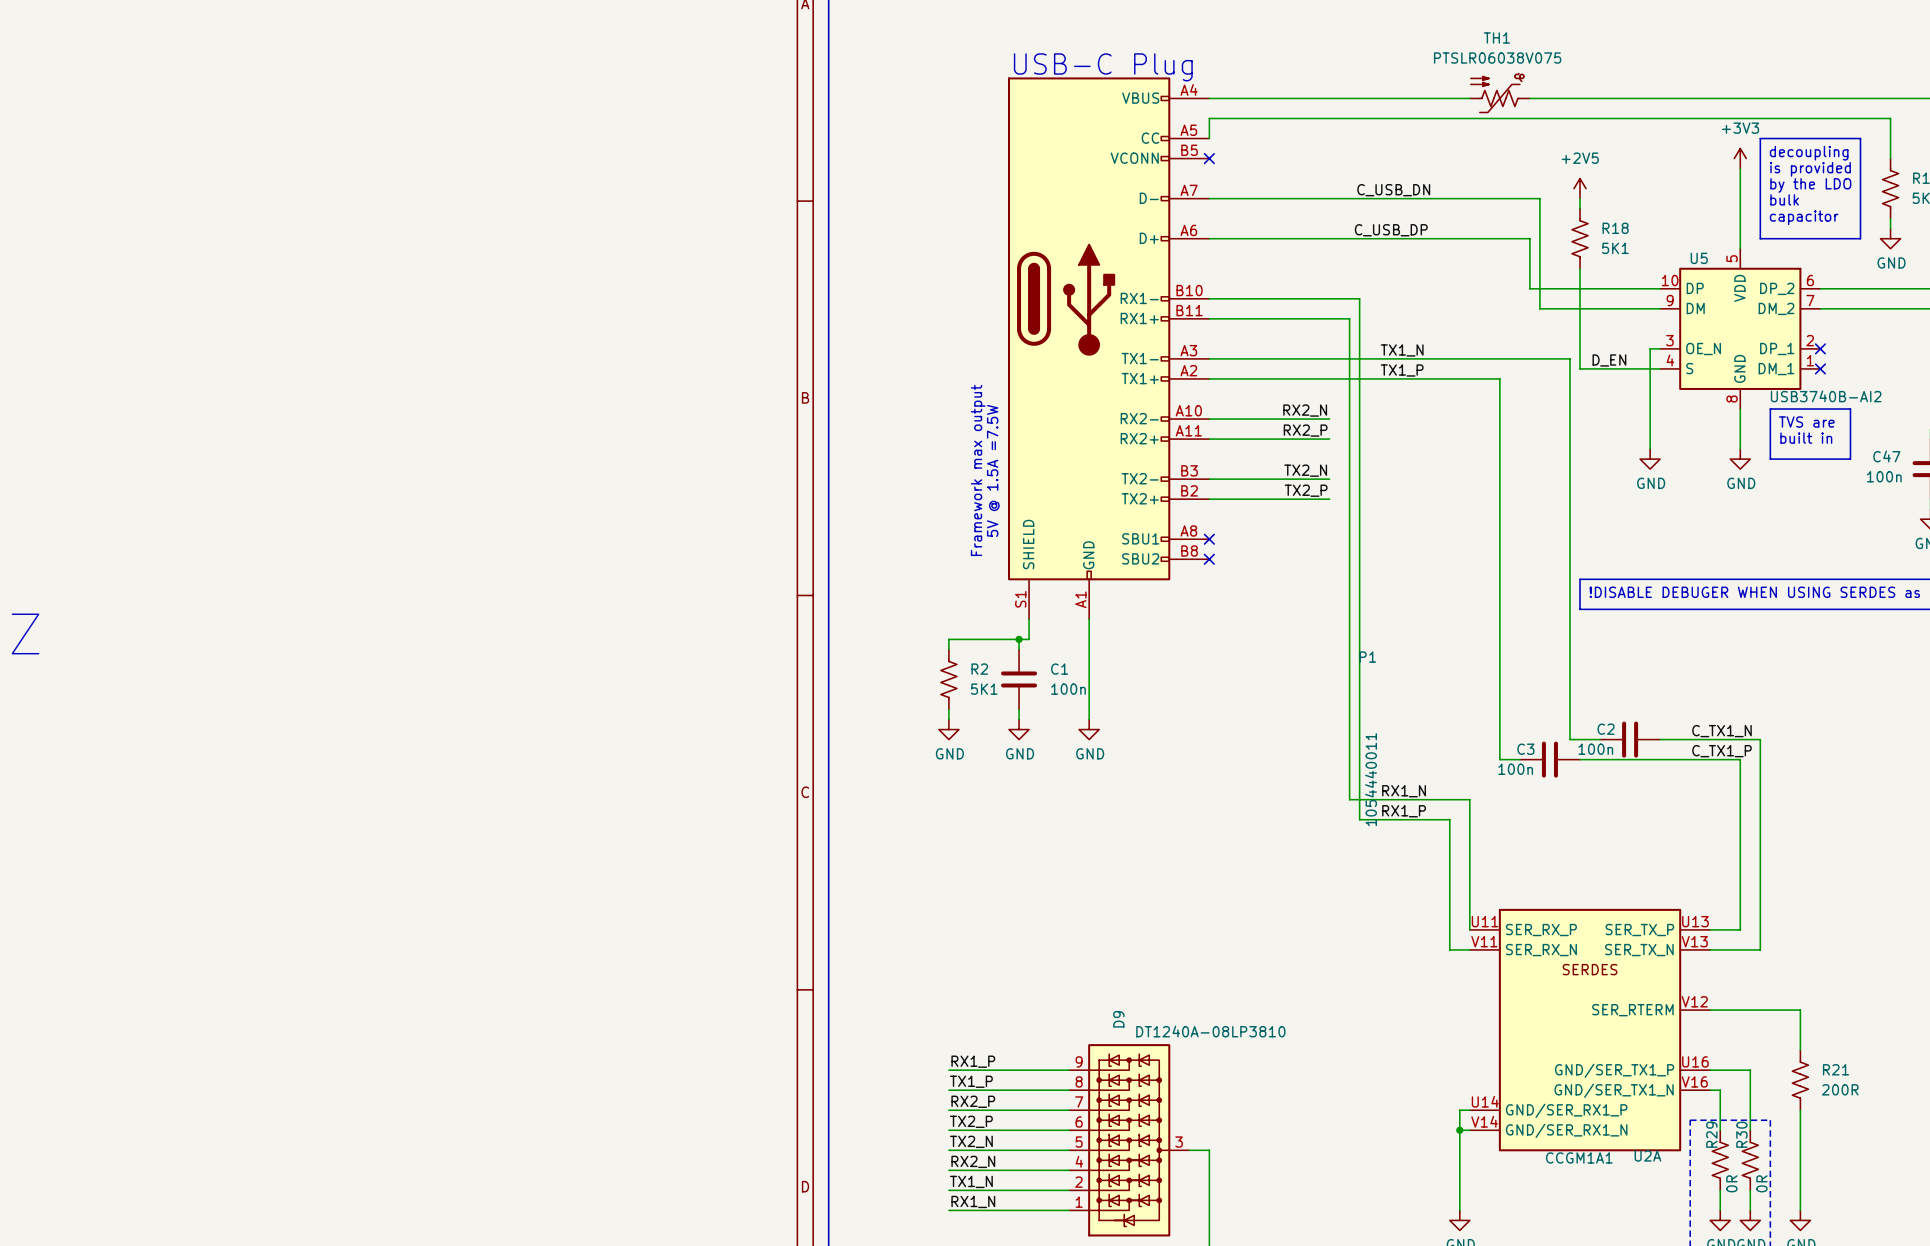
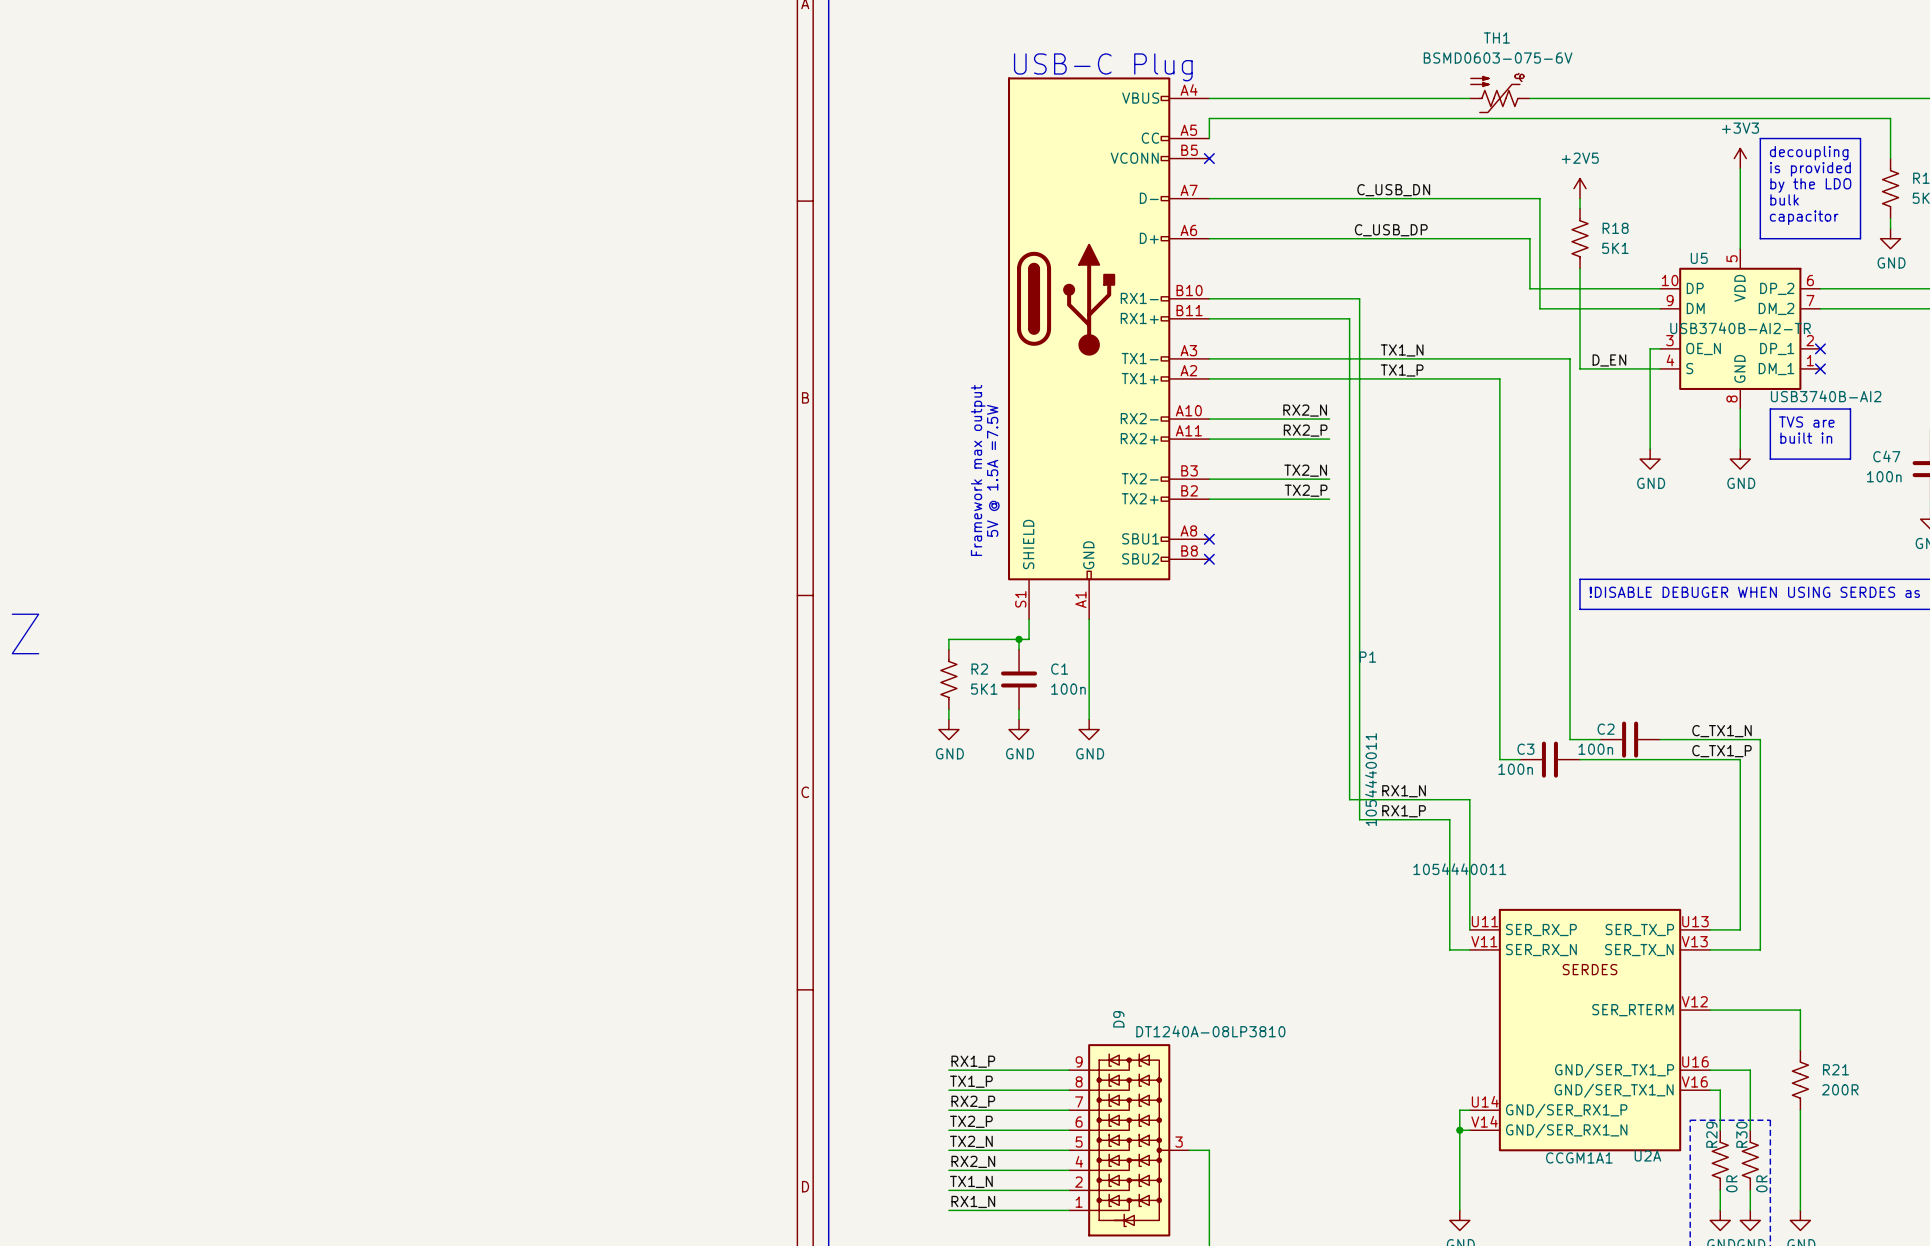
TH1 value: PTSLR06038V075 (1497, 58) -> BSMD0603-075-6V (1498, 58)
U5 text: none -> USB3740B-AI2-TR (1740, 328)
P1 text: none -> 1054440011 (1459, 869)

